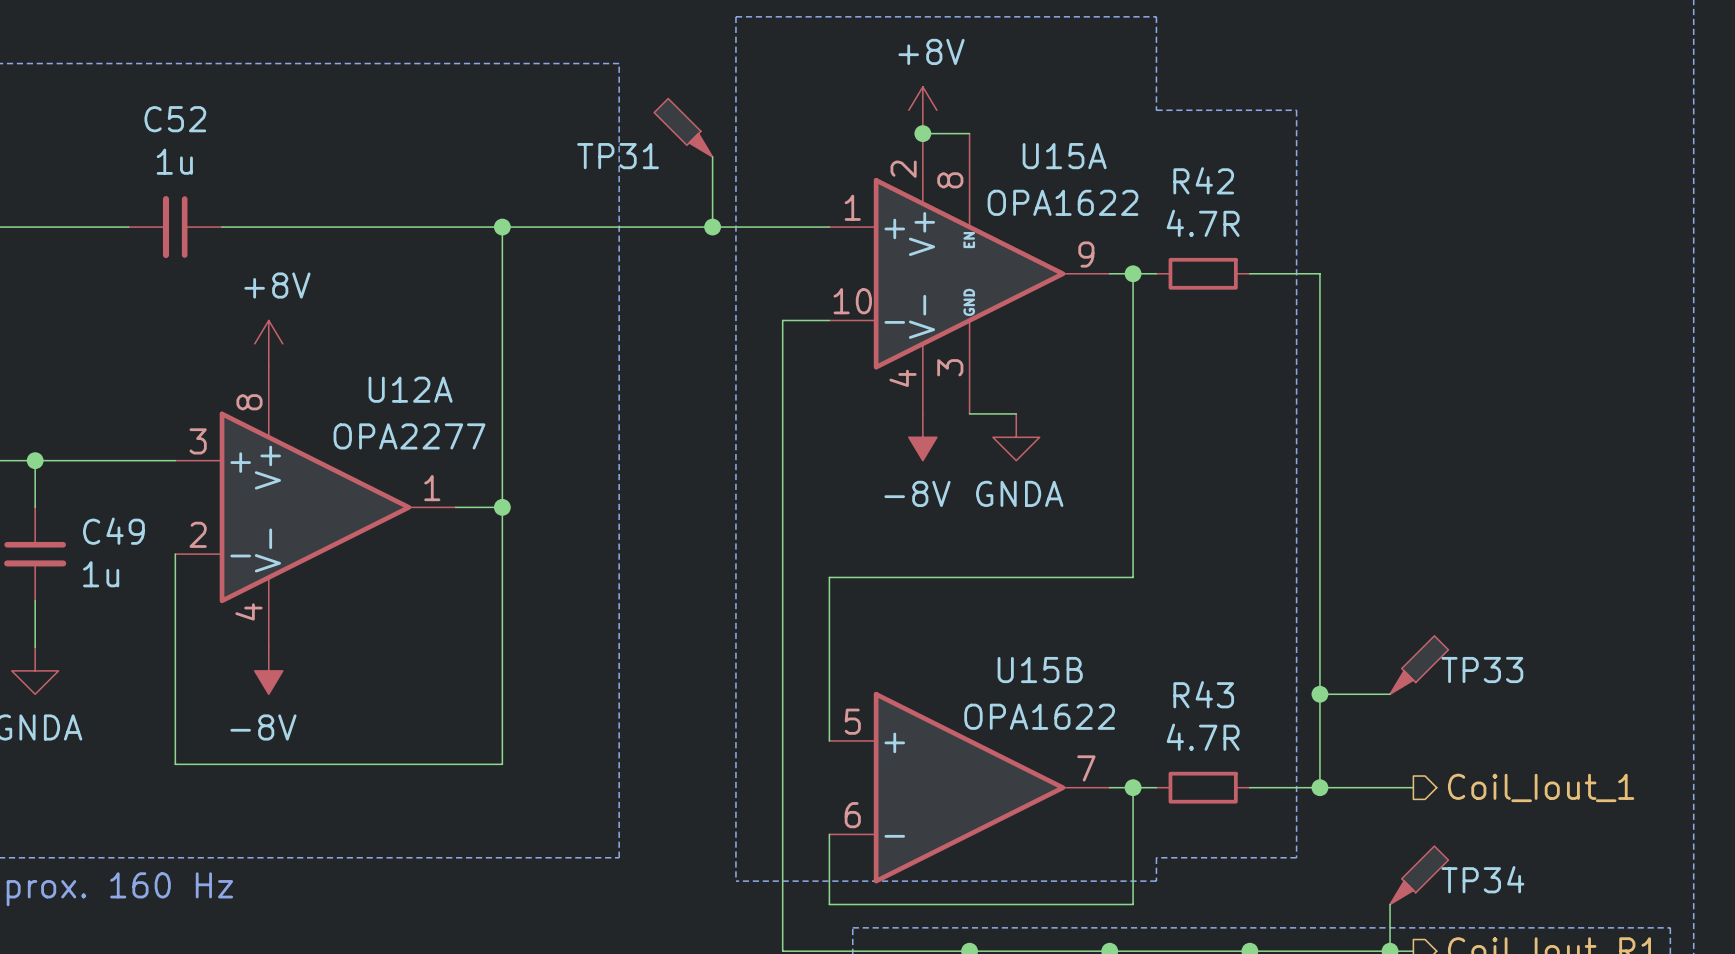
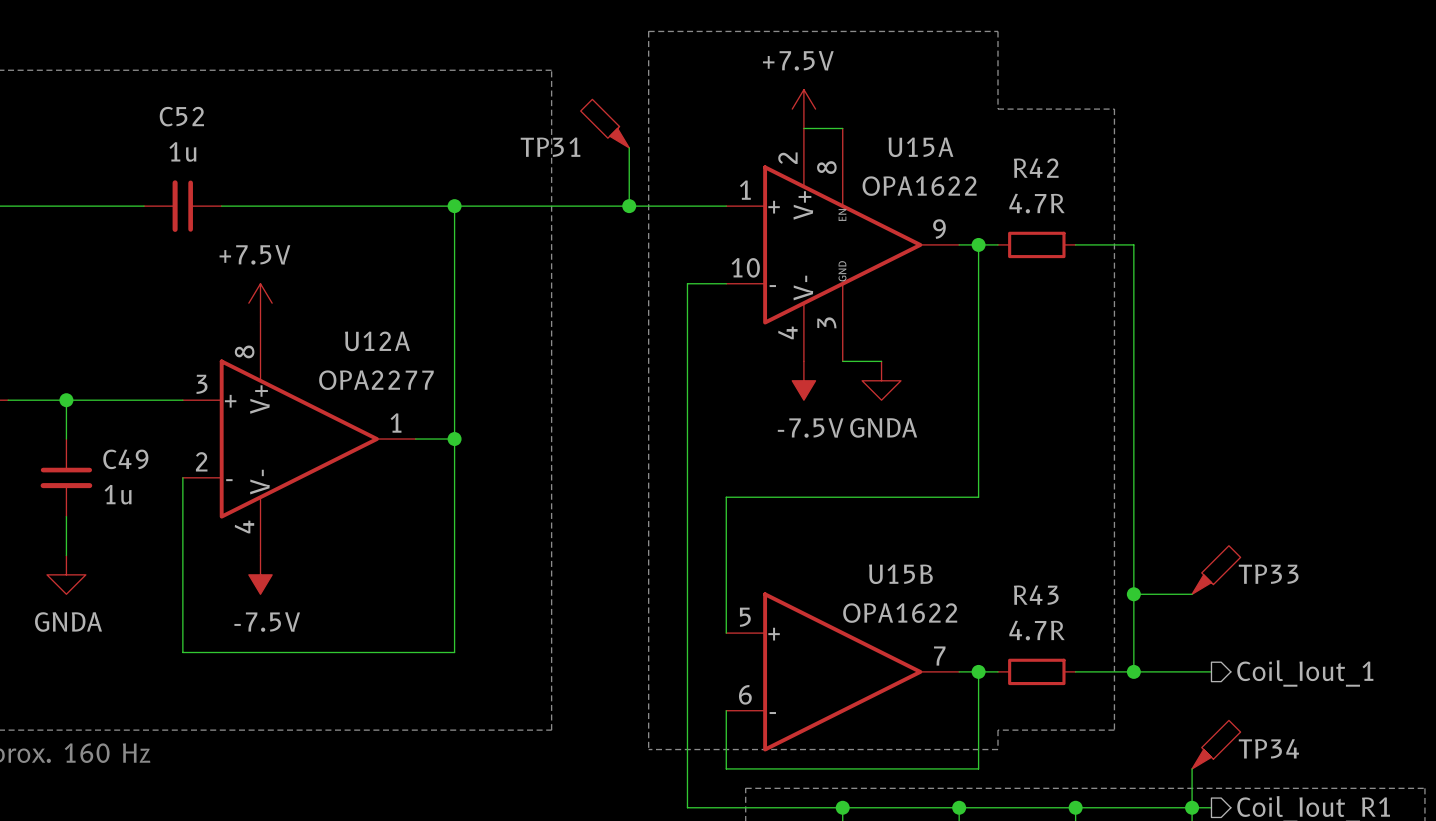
power symbol: +8V (922, 110) -> +7.5V (803, 109)
junction: (922, 133) -> none
power symbol: +8V (268, 343) -> +7.5V (260, 303)
power symbol: -8V (922, 437) -> -7.5V (803, 380)
power symbol: -8V (268, 670) -> -7.5V (260, 574)

